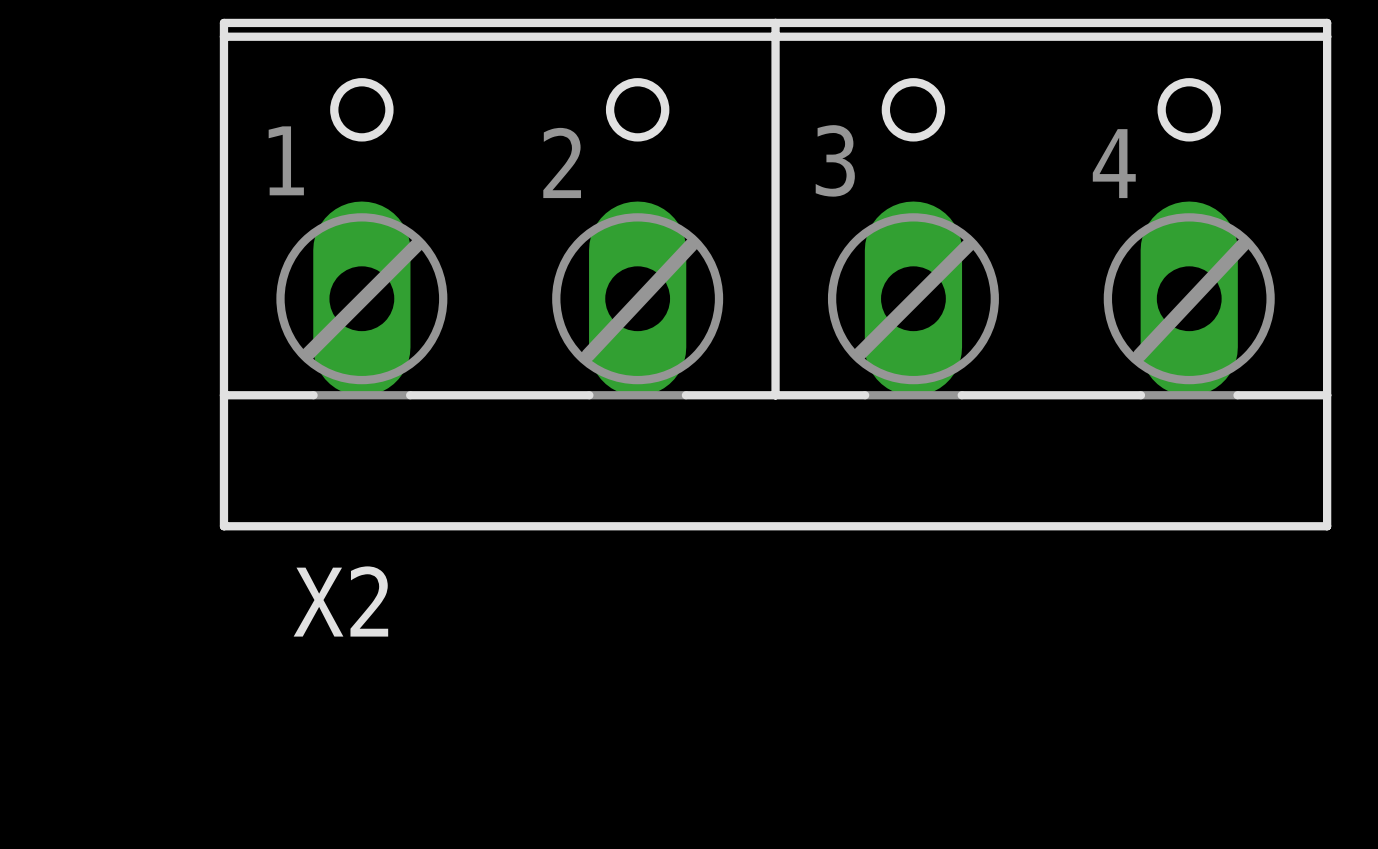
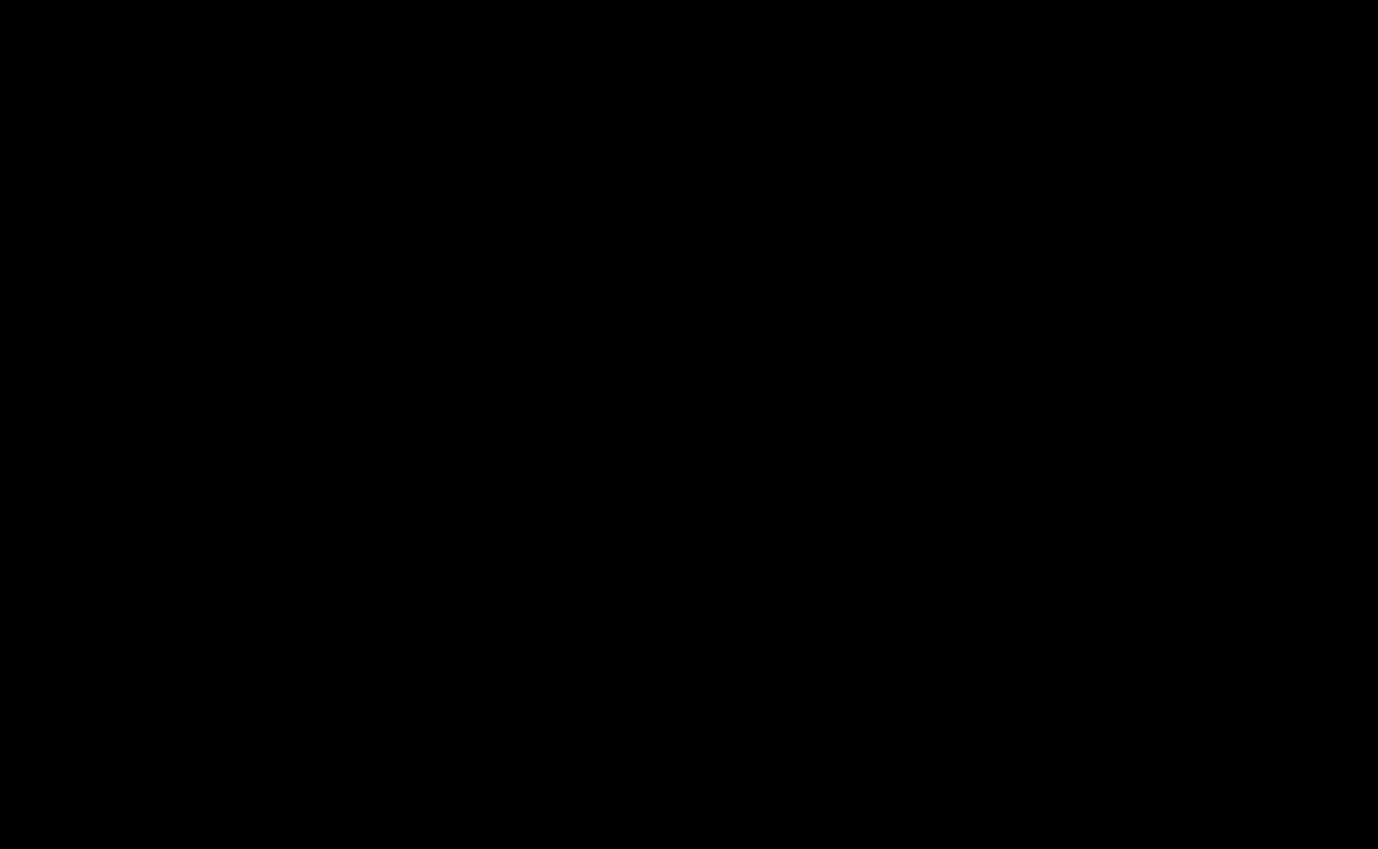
X2: (775, 274) -> none

